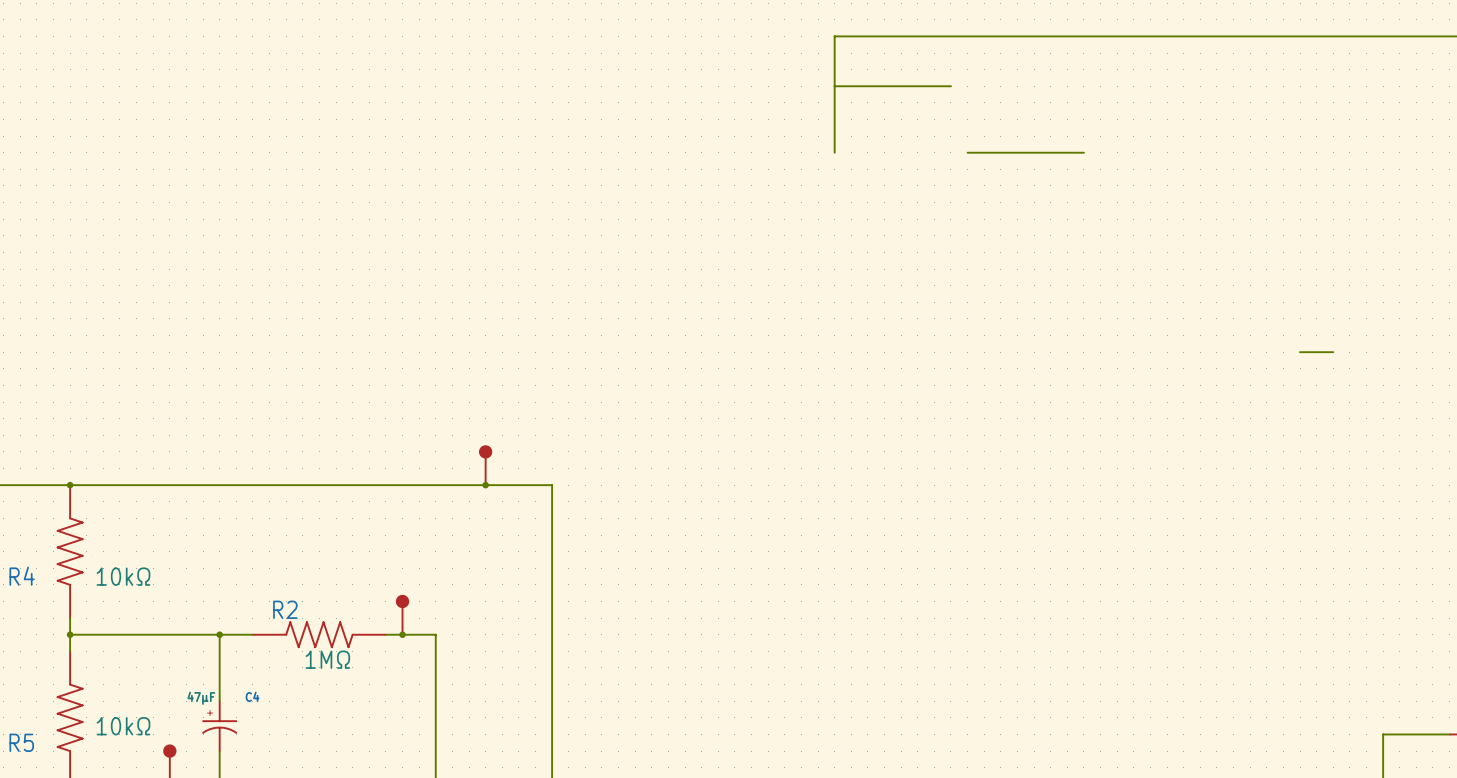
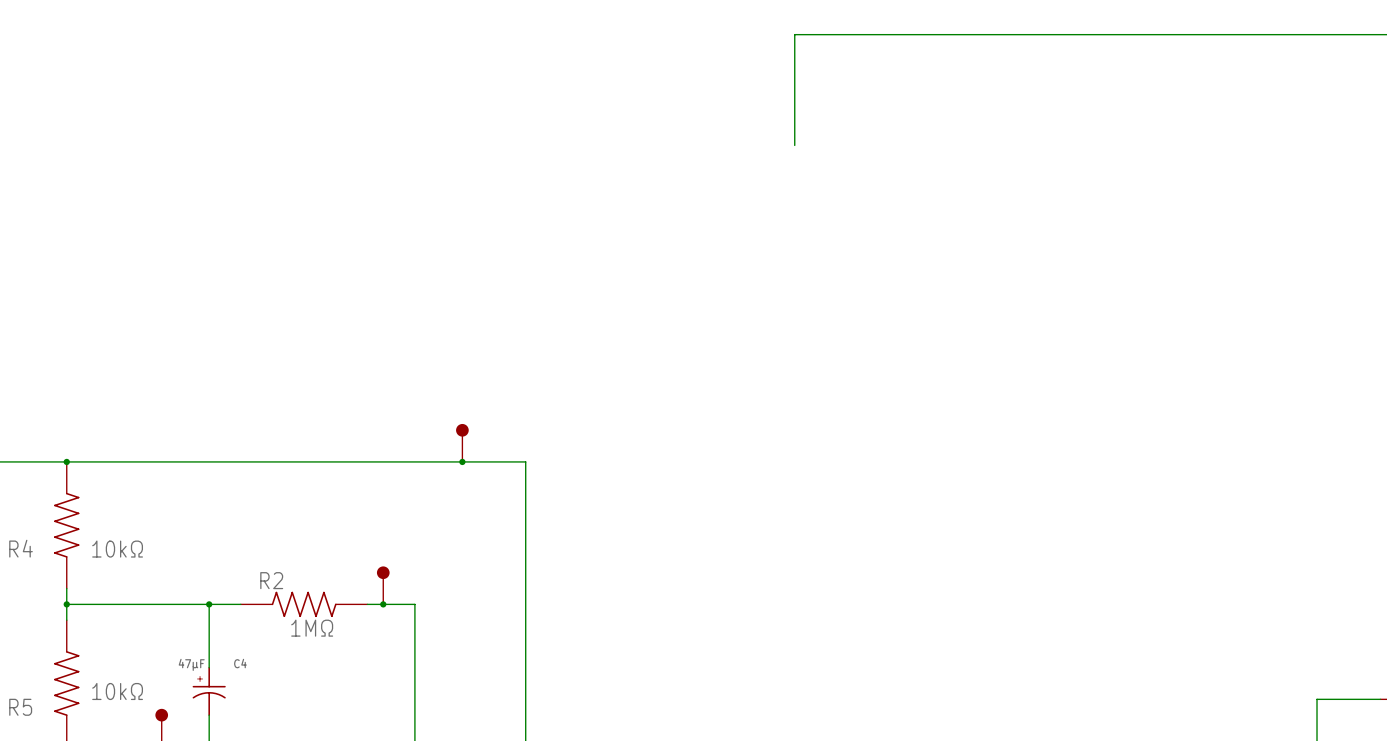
wire: (834, 86) (950, 86) -> none
wire: (967, 152) (1083, 152) -> none
wire: (1300, 352) (1333, 352) -> none

